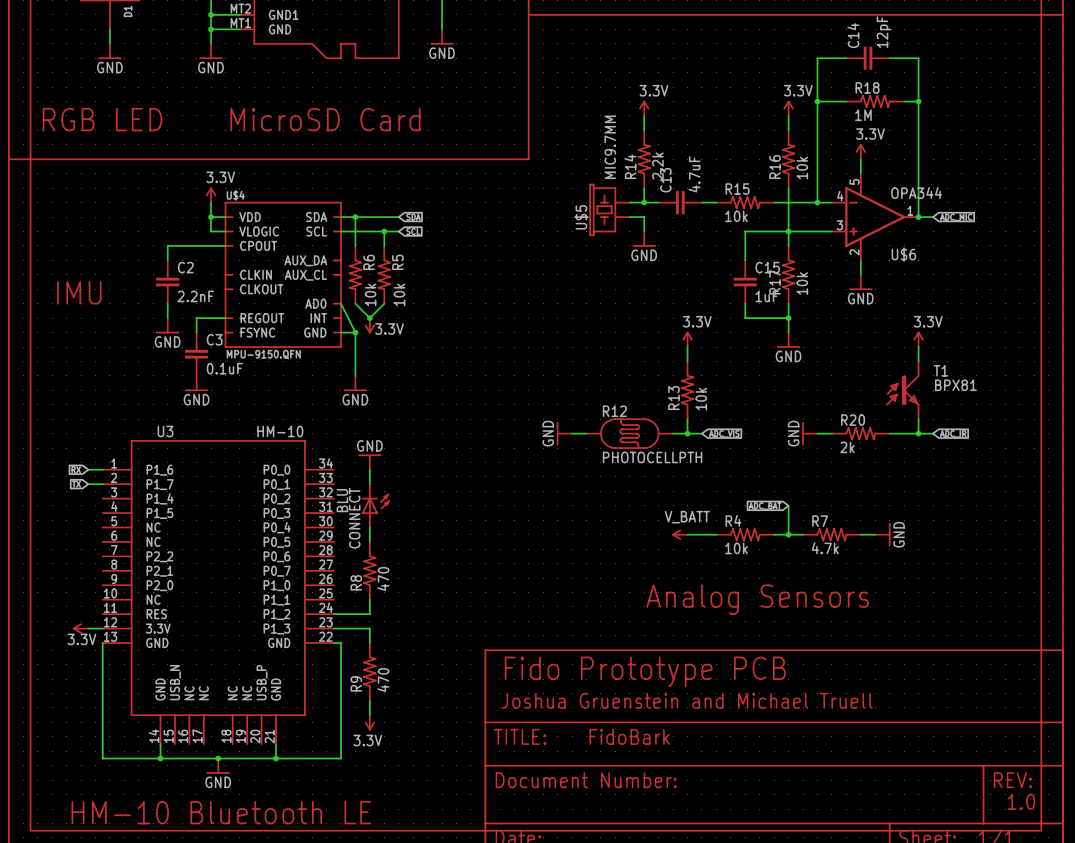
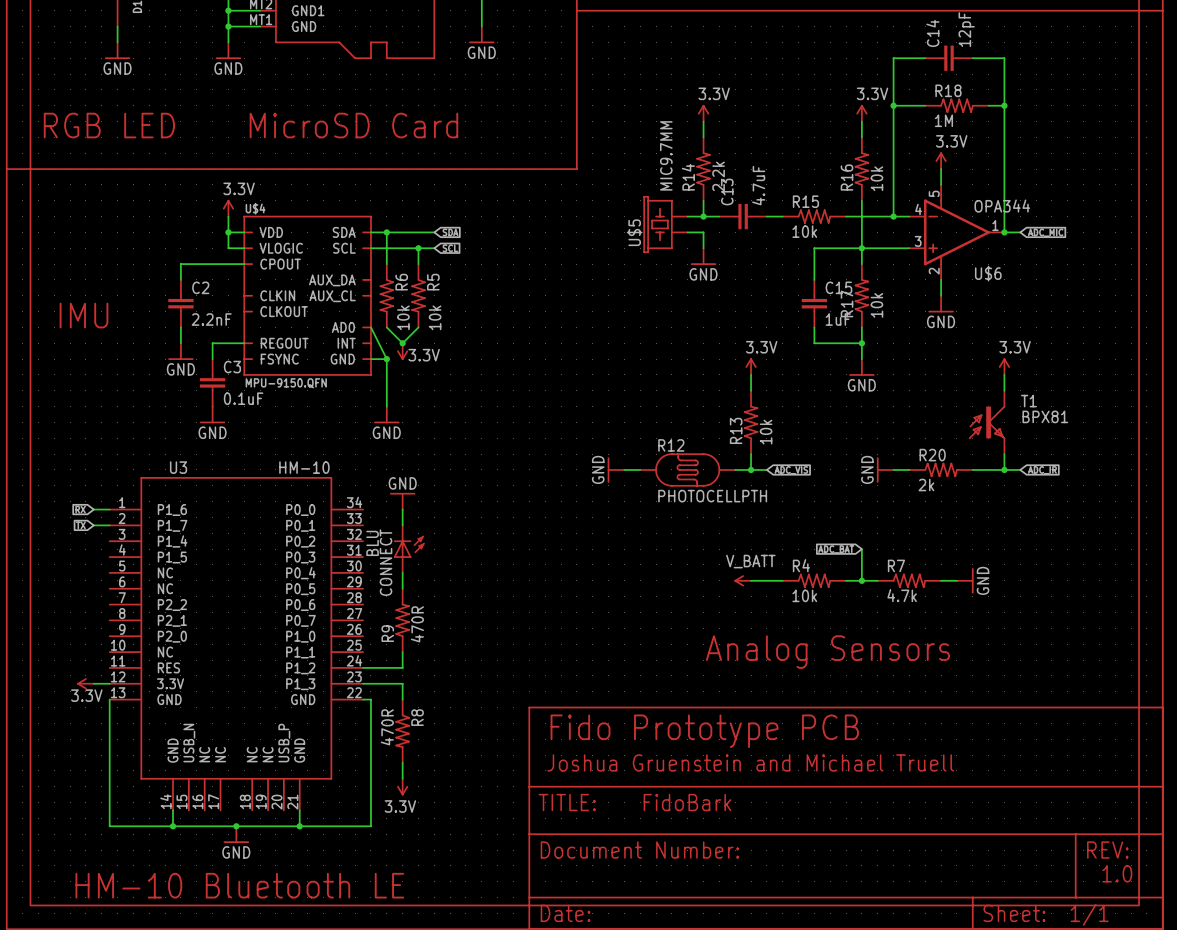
R8 symbol: [363, 541, 377, 600] -> [395, 699, 410, 763]
R8 value: 470 (383, 578) -> 470R (387, 727)
R8 name position: R8 (356, 582) -> R8 (417, 717)
R9 symbol: [363, 643, 377, 701] -> [395, 588, 410, 653]
R9 value: 470 (383, 680) -> 470R (417, 624)

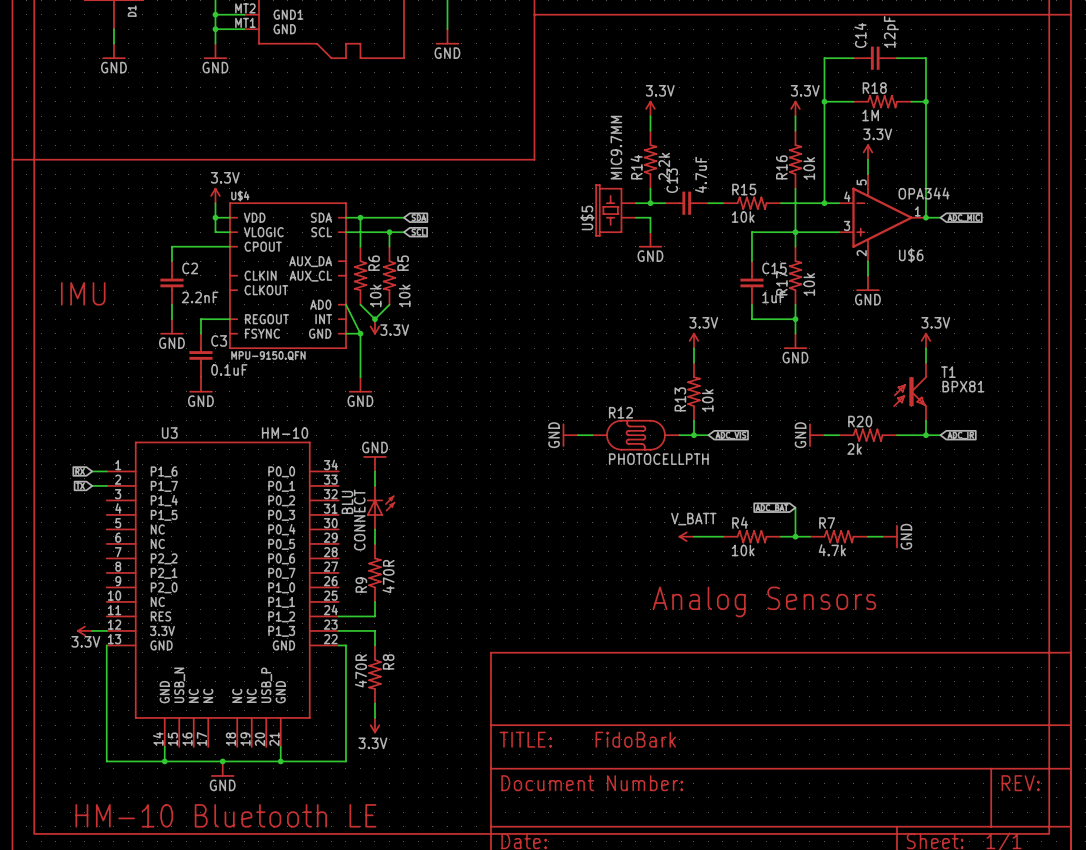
text: RGB LED (109, 125) -> none
text: MicroSD Card (353, 125) -> none
text: Fido Prototype PCB (704, 731) -> none
text: Joshua Gruenstein and Michael Truell (750, 762) -> none
text: 1.0 (1117, 873) -> none

